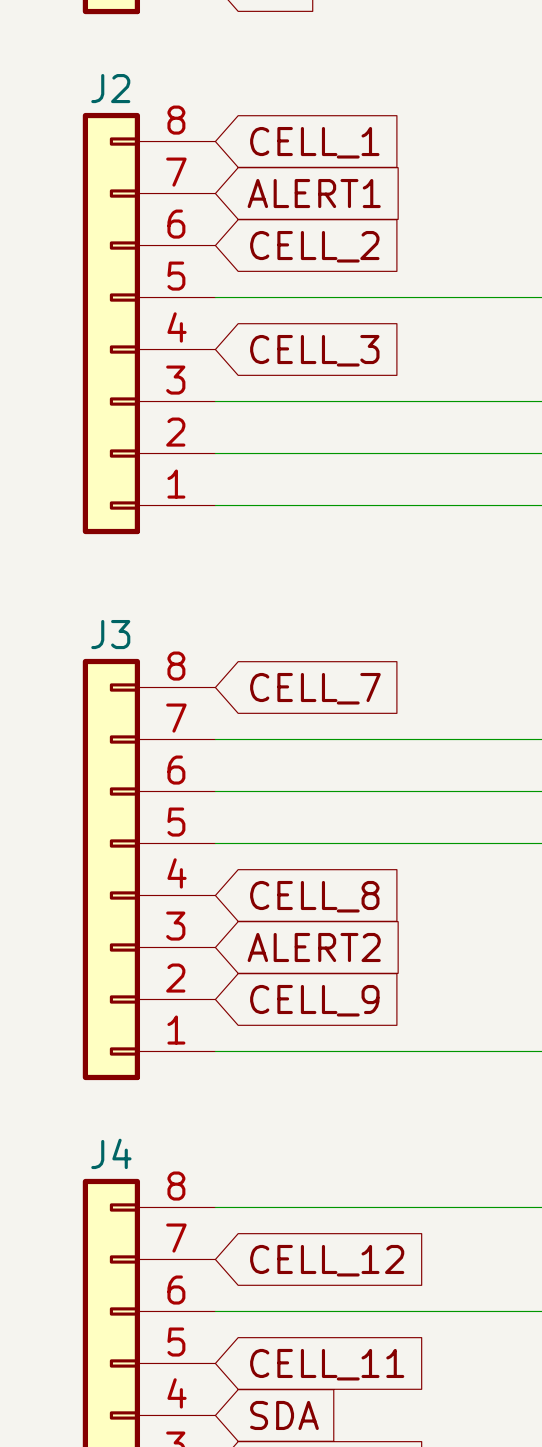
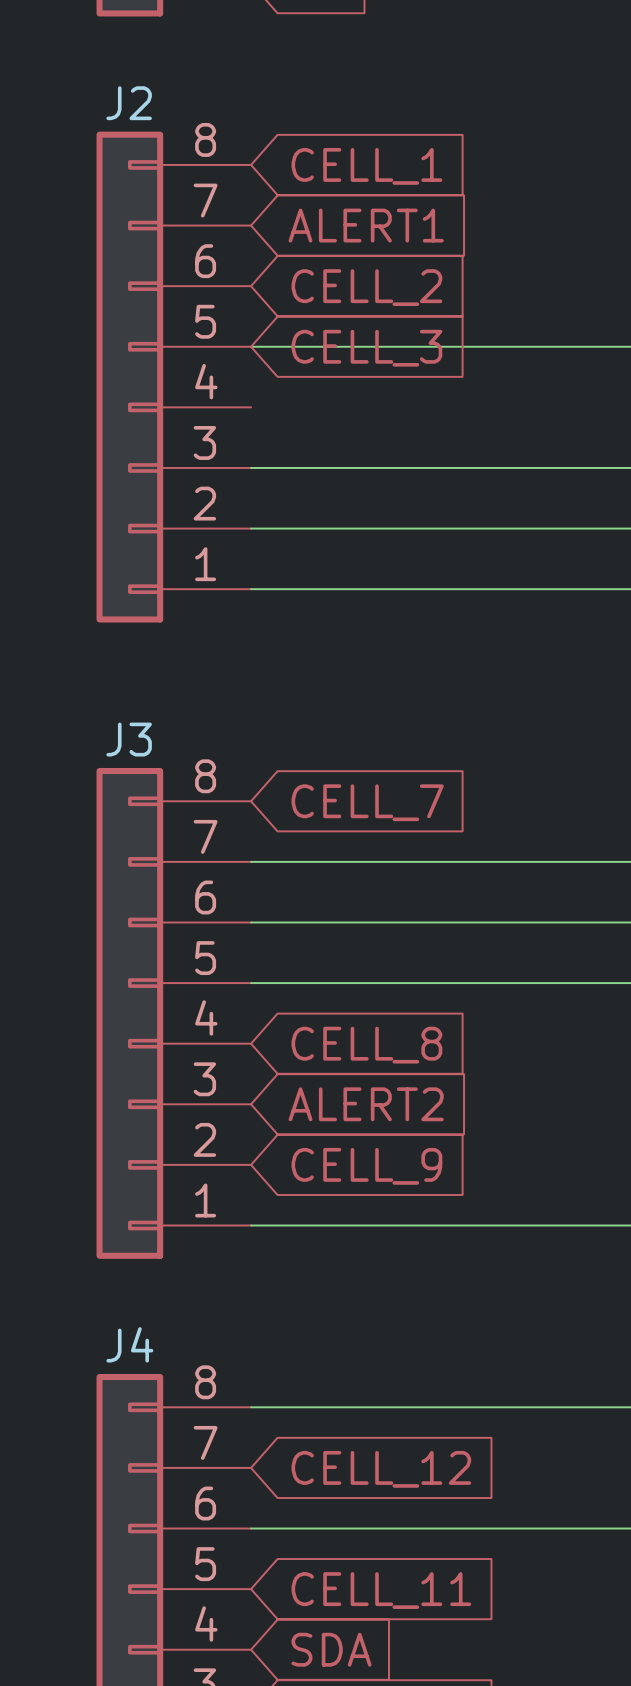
global label position: CELL_3 (314, 350) -> CELL_3 (366, 348)

